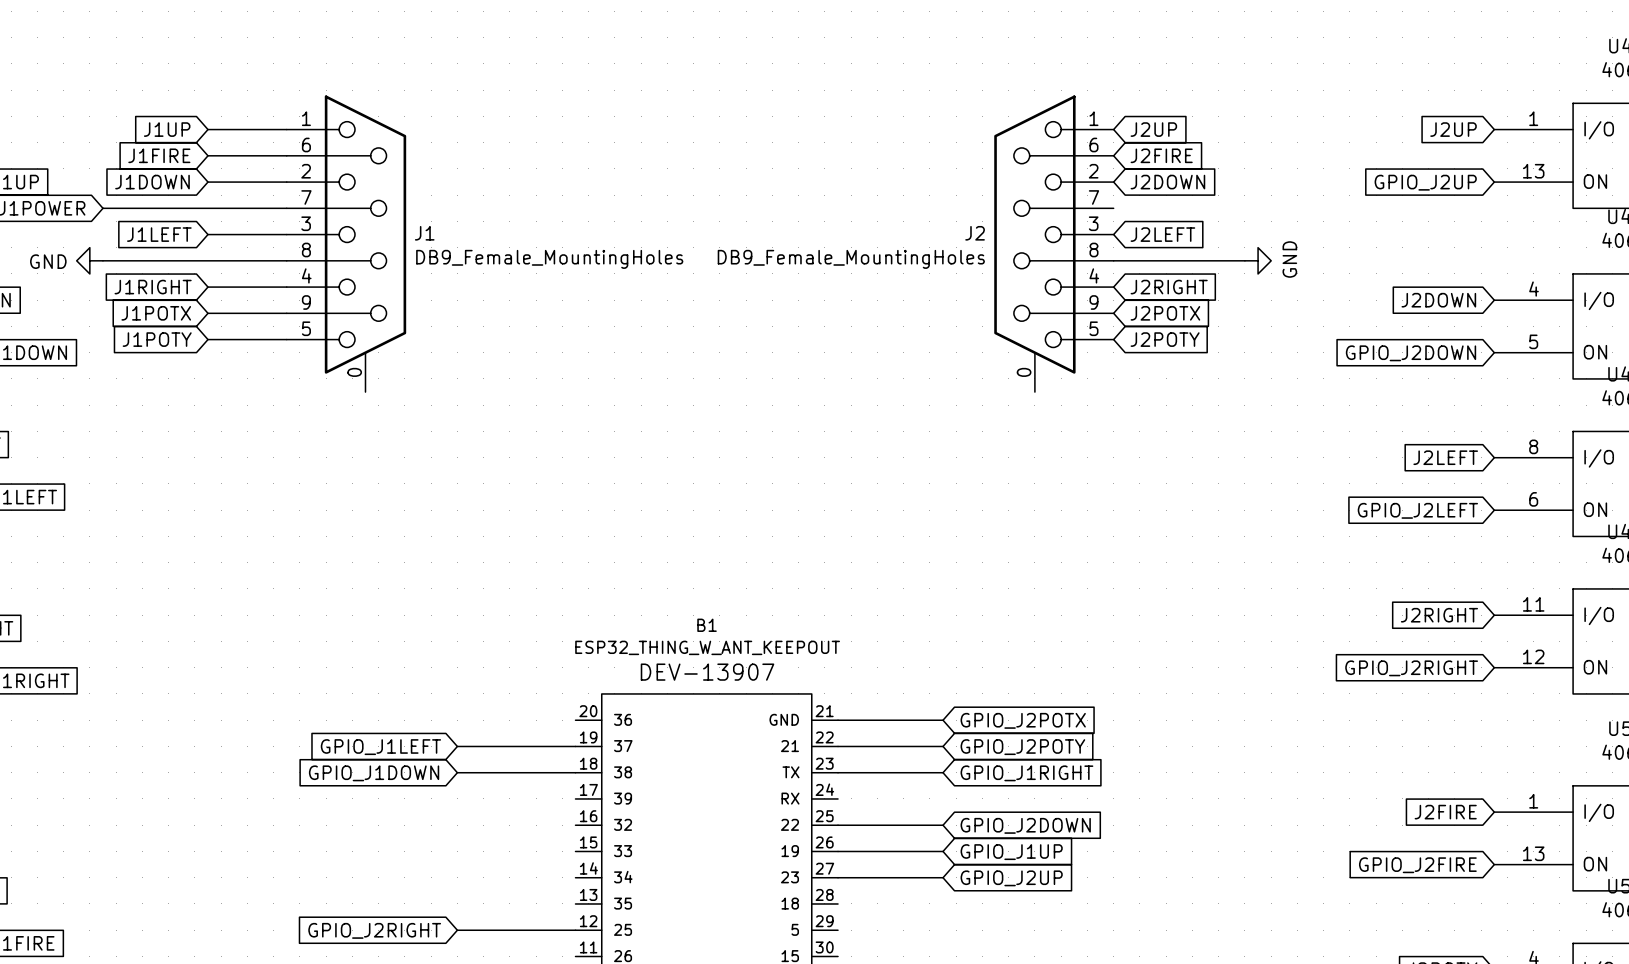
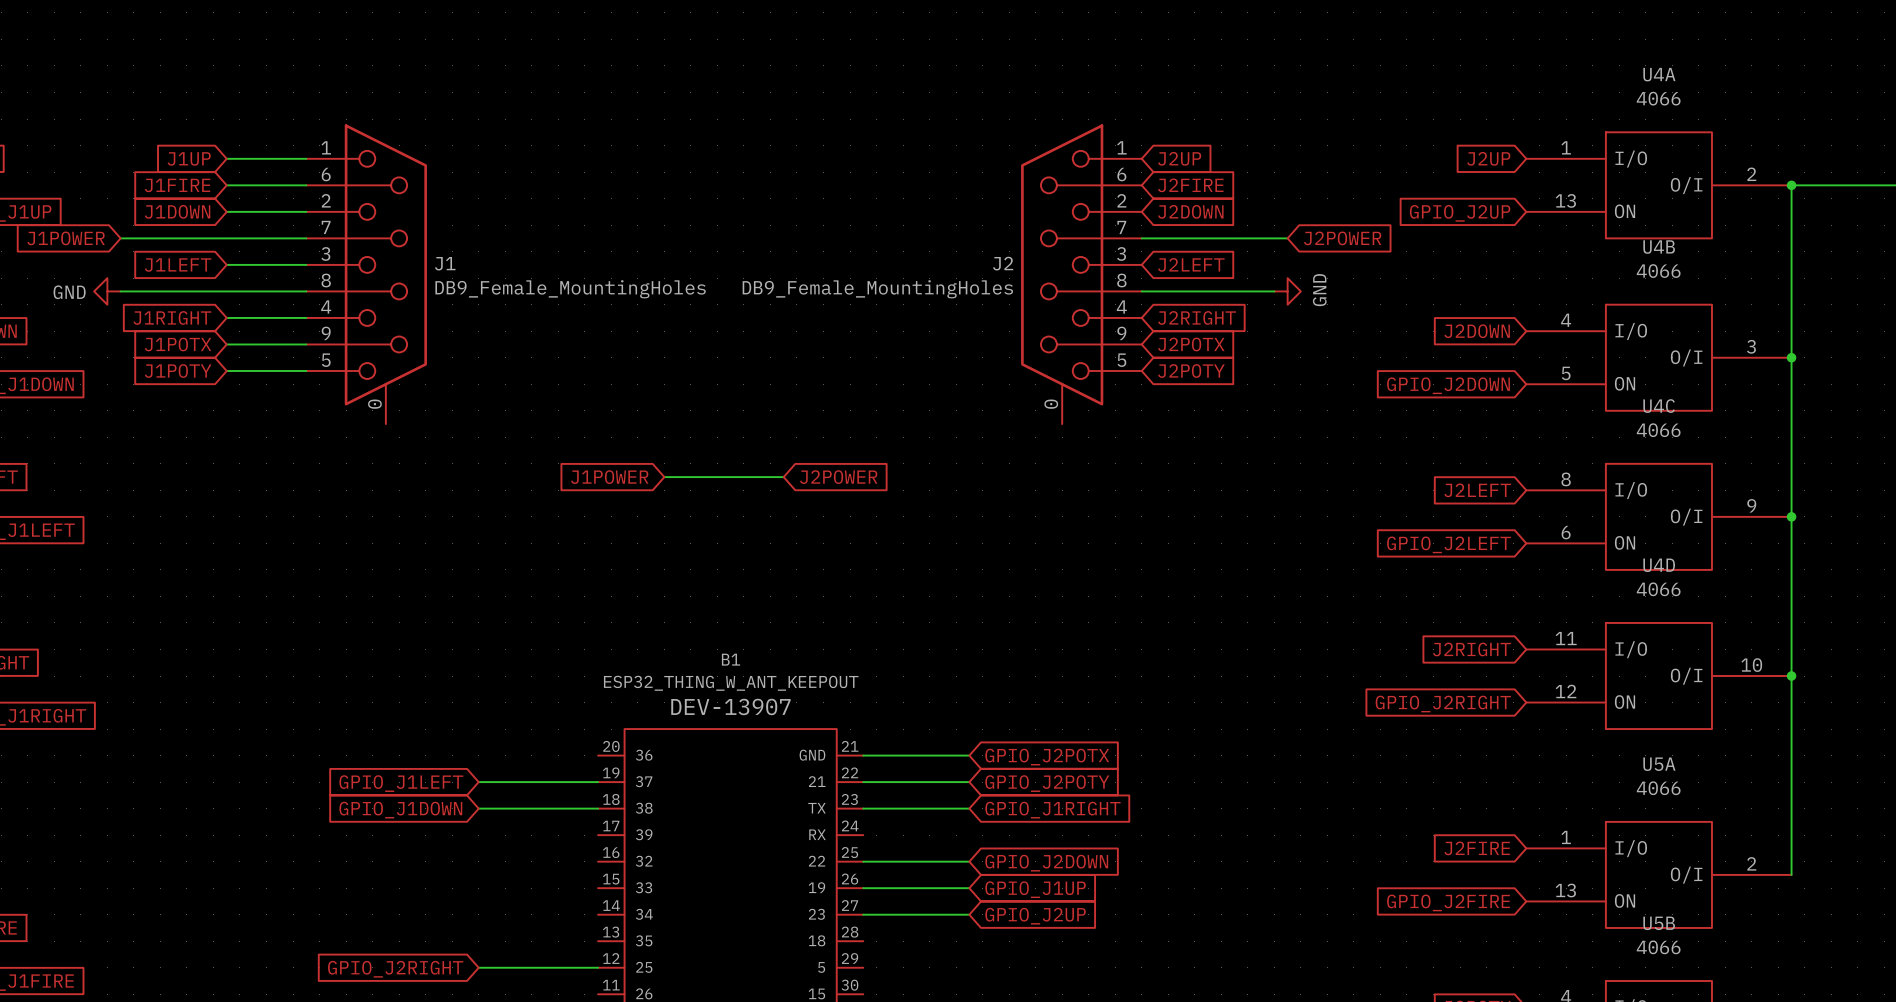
wire: none -> (1141, 238) (1287, 238)
global label: none -> J2POWER (1342, 238)
global label: none -> J1POWER (609, 477)
wire: none -> (664, 477) (783, 477)
global label: none -> J2POWER (838, 477)

